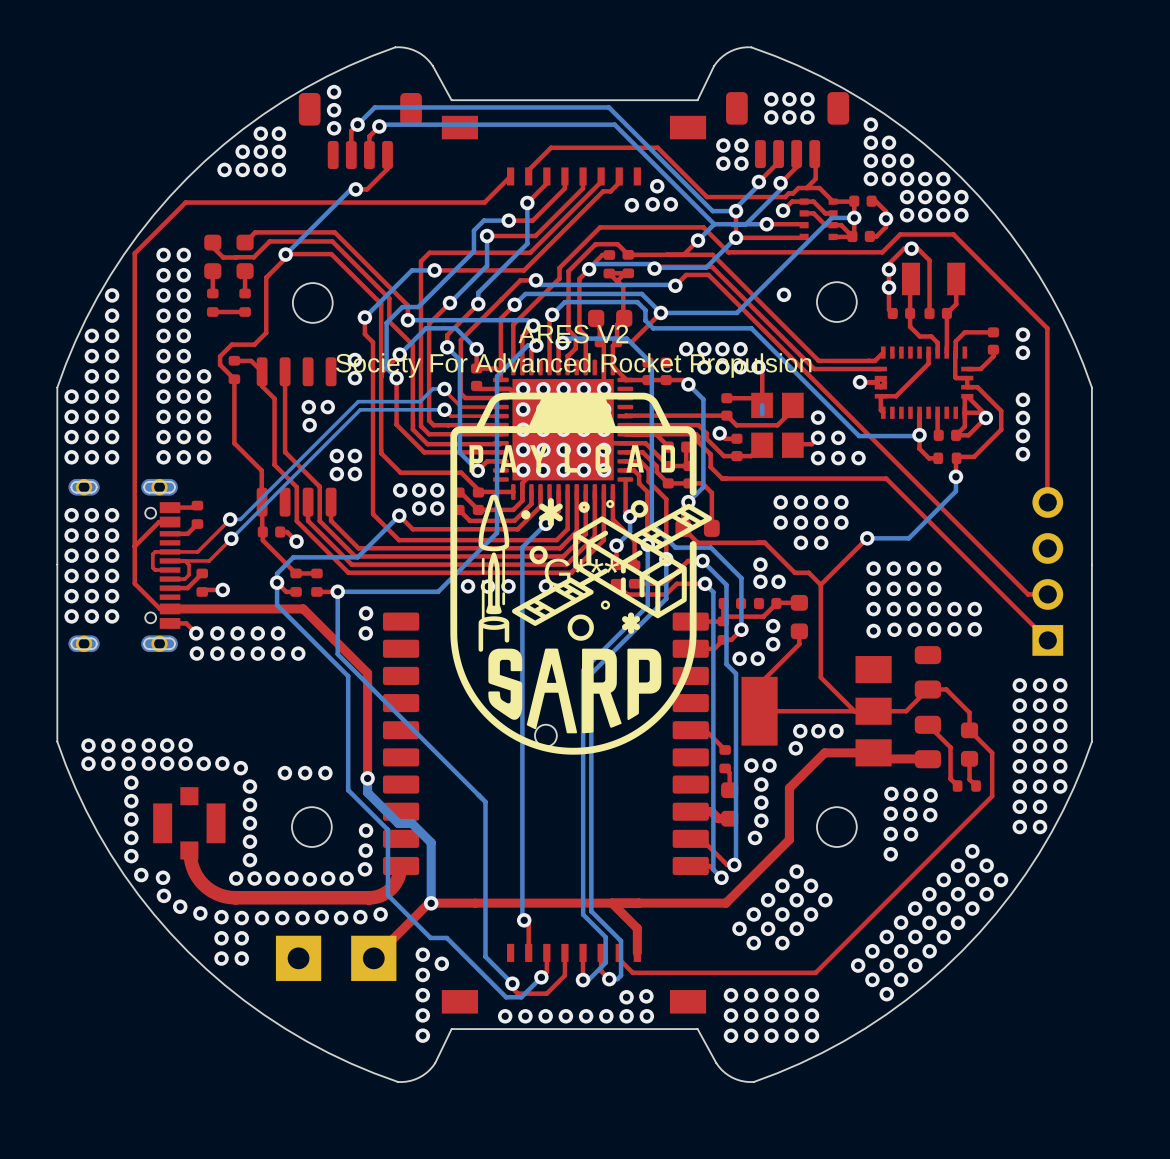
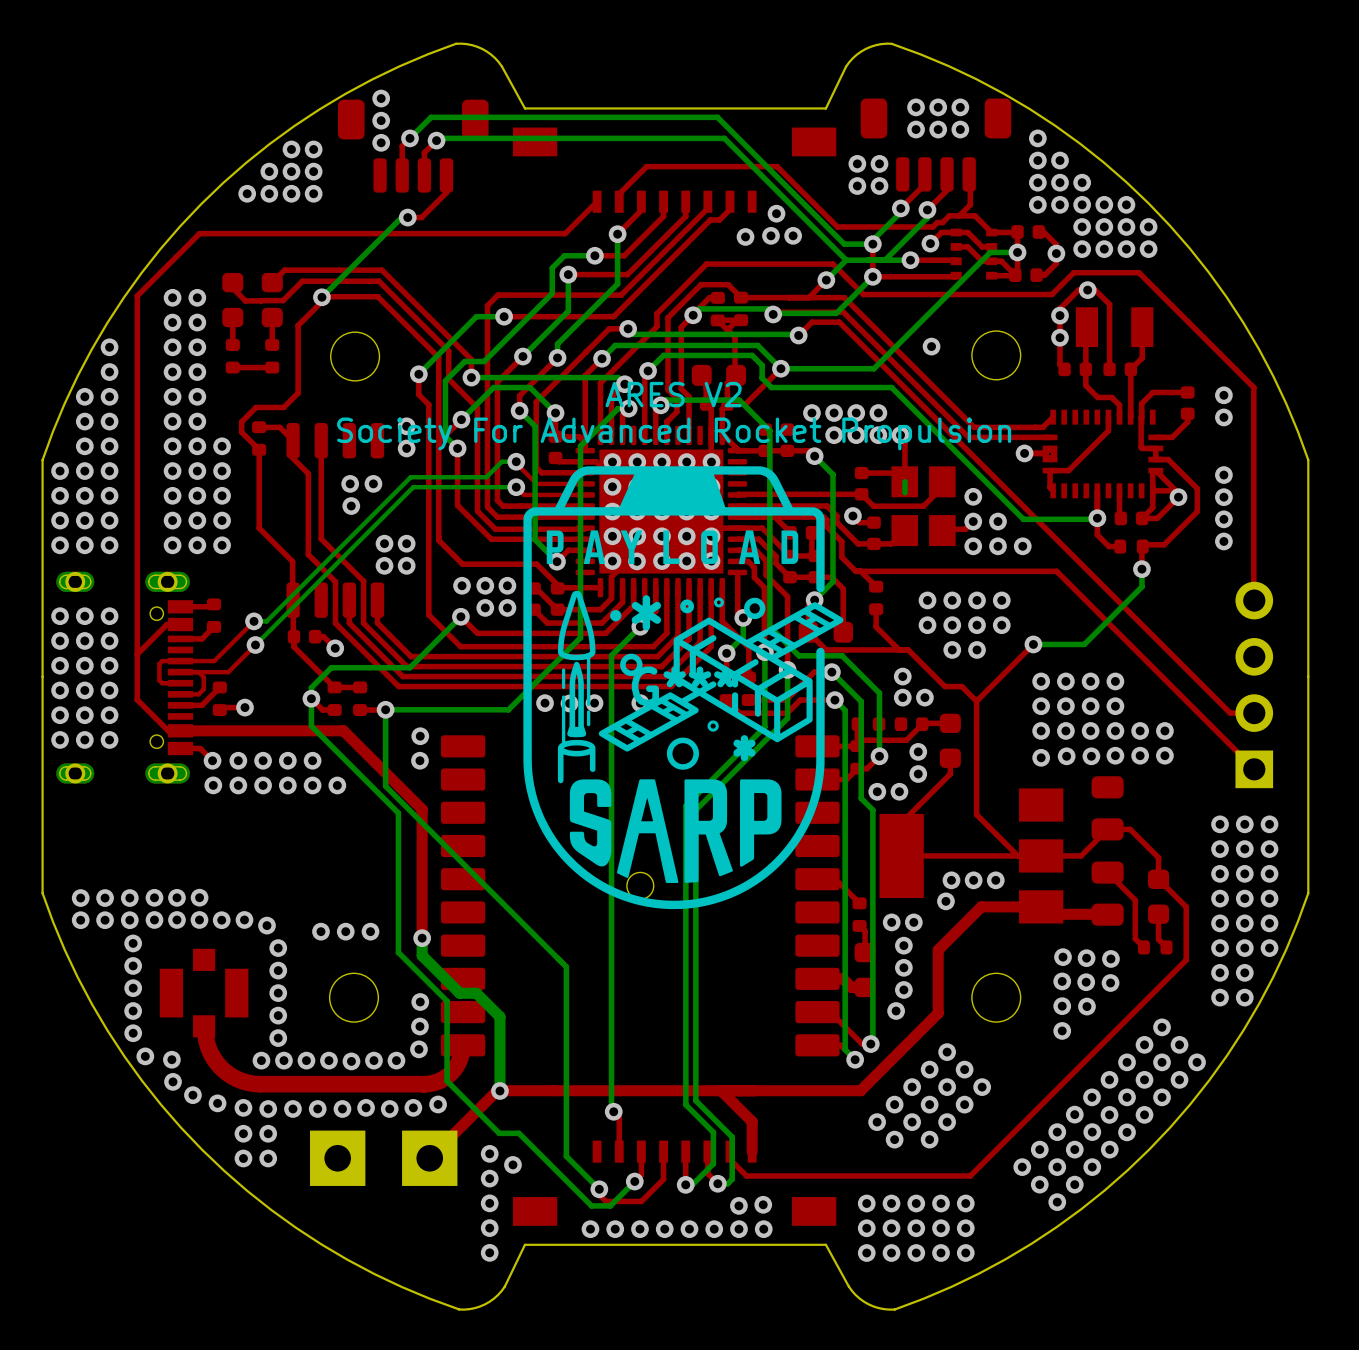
top track: none -> (860, 571) (876, 586)
part: none -> (876, 597)
top track: none -> (876, 609) (876, 627) (899, 649)

